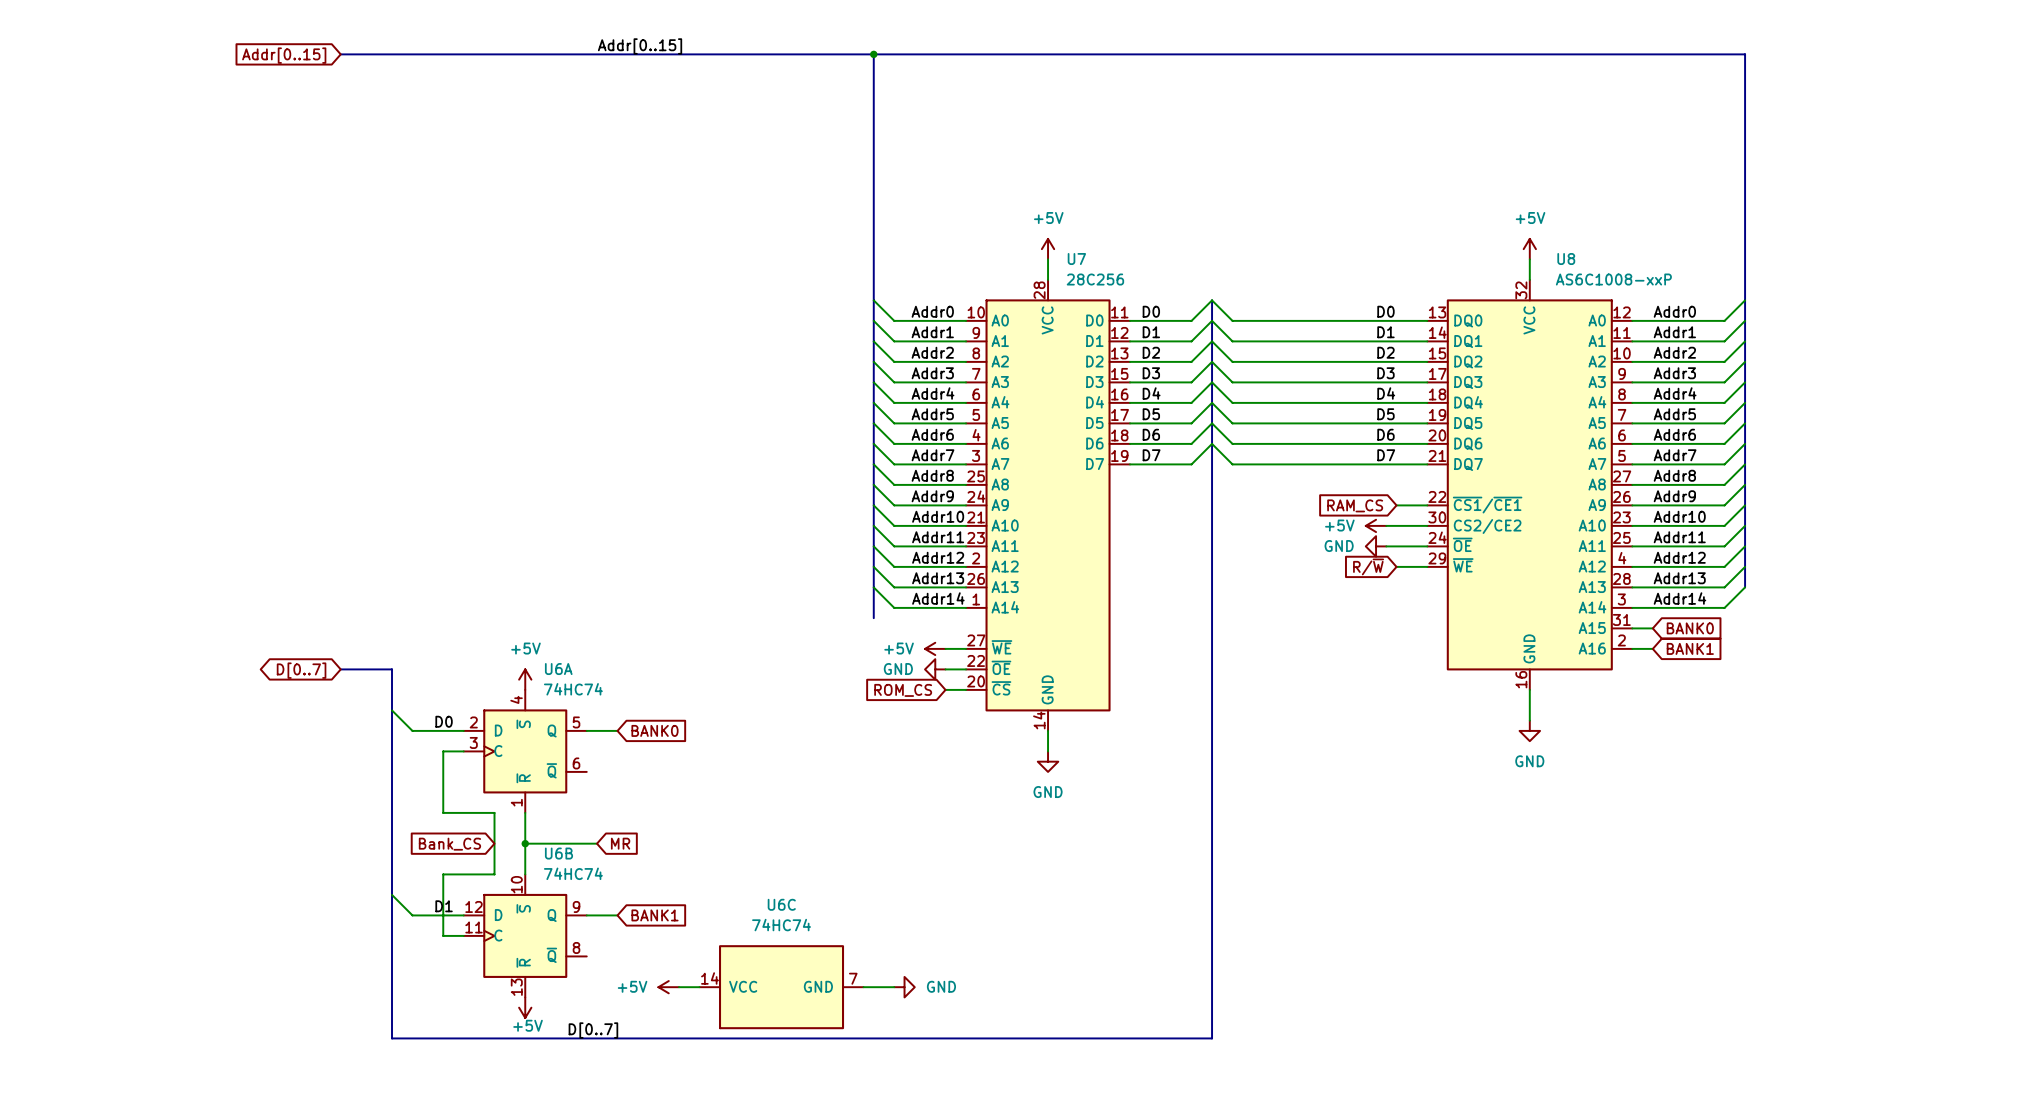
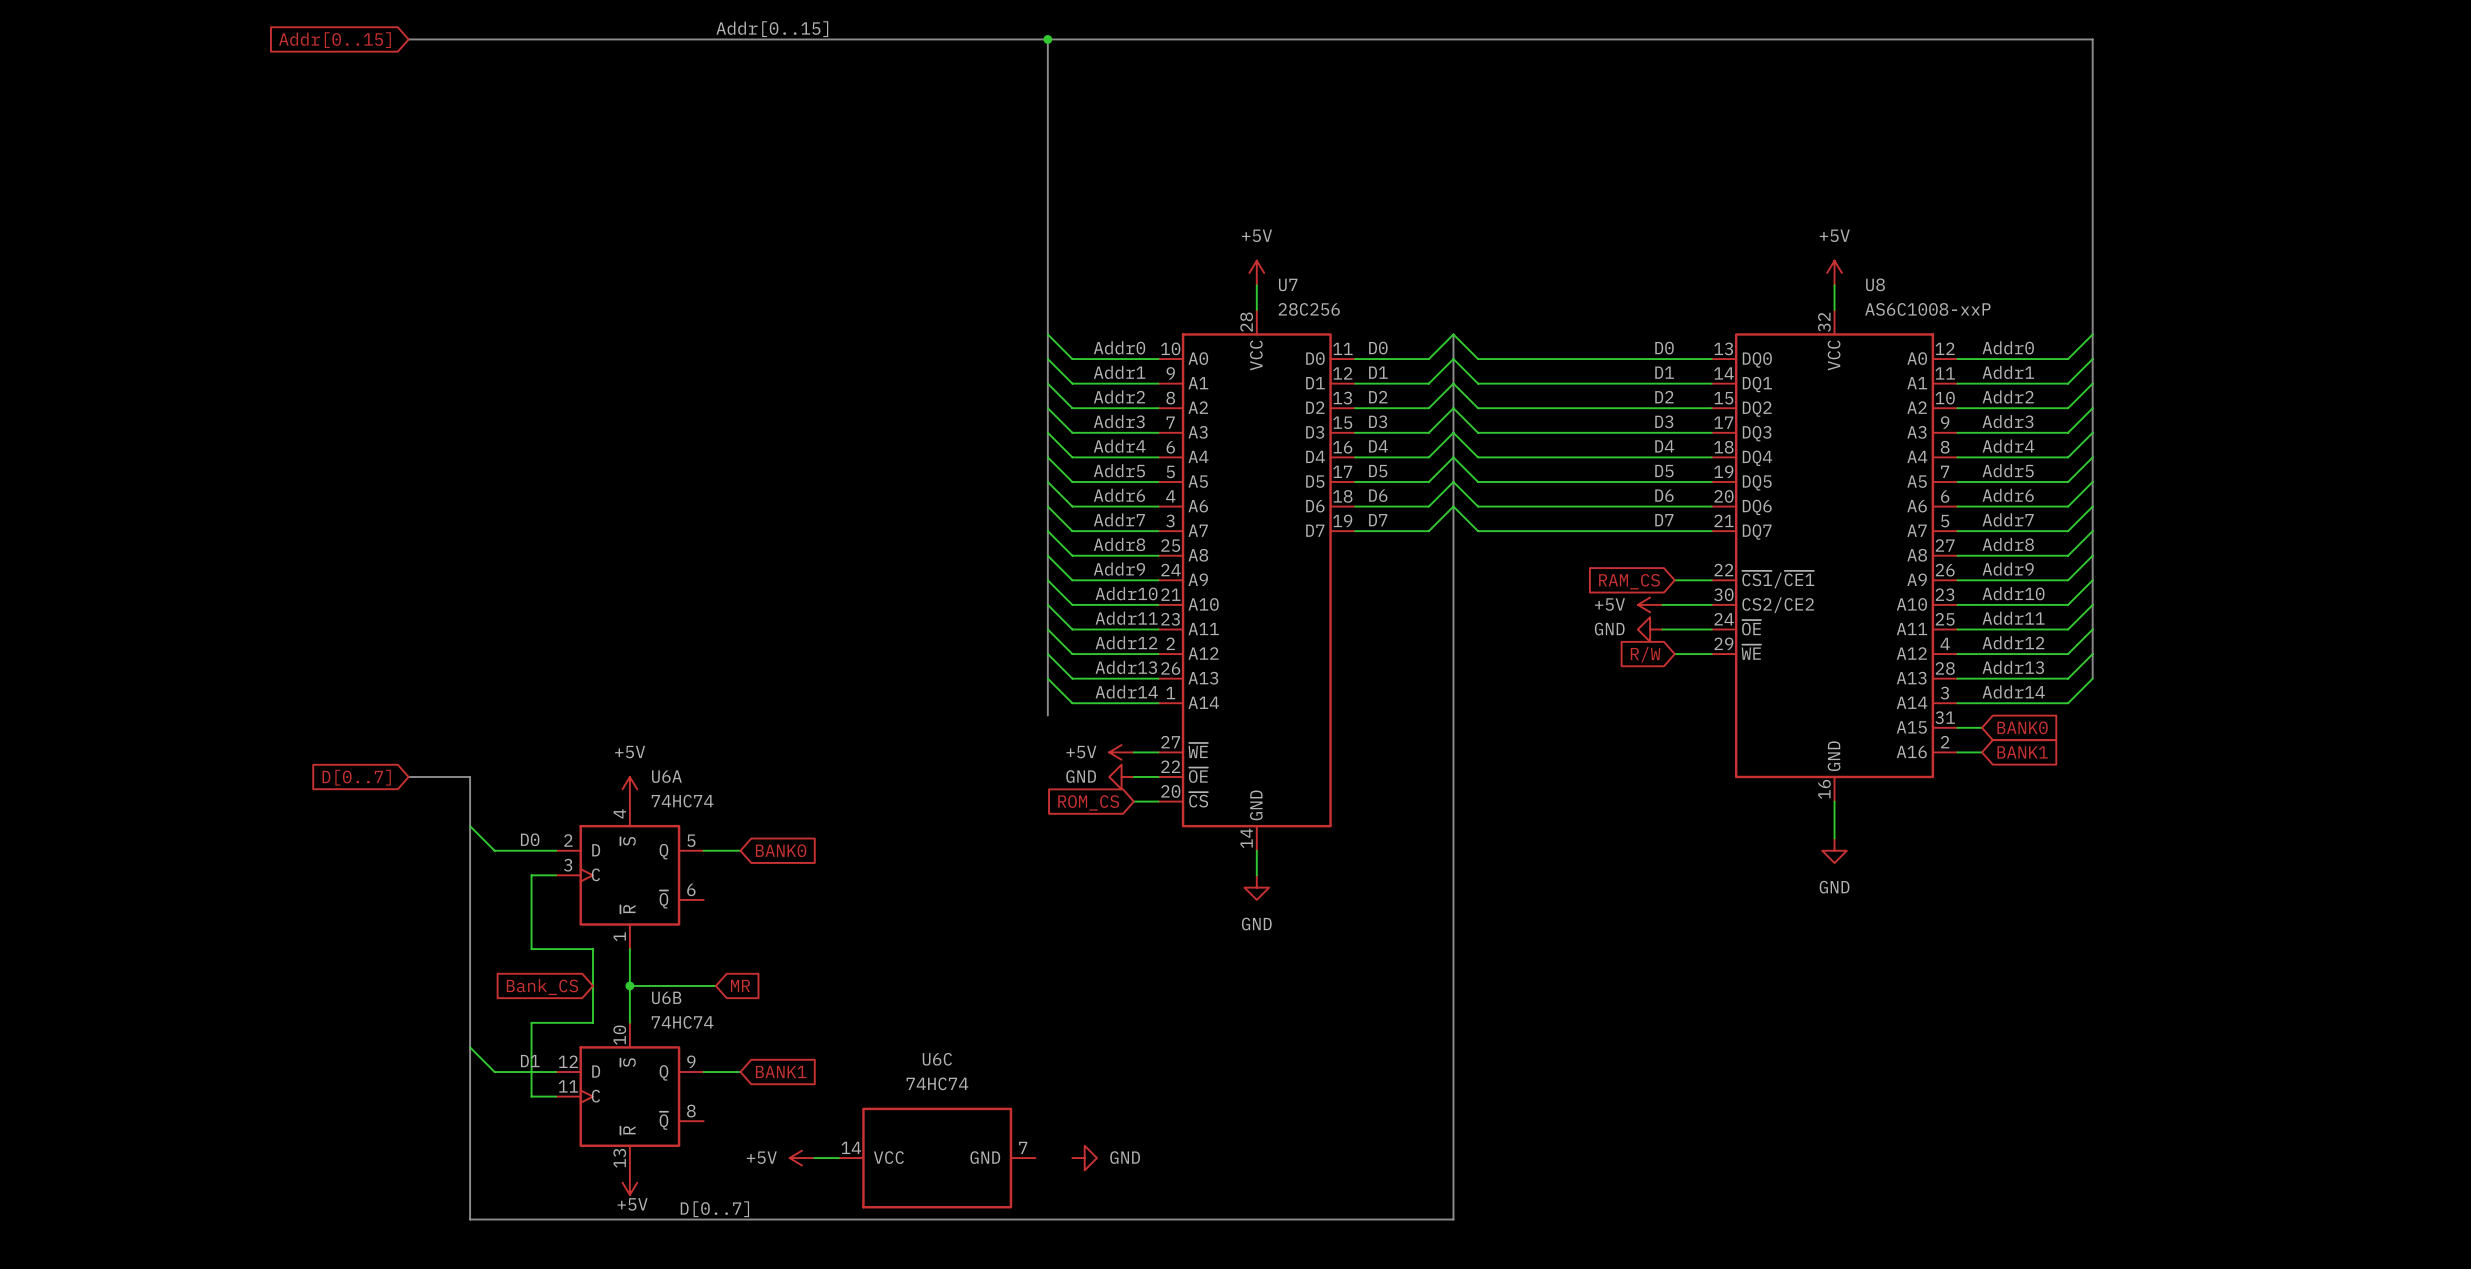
global label: R/~{W} (1368, 566) -> R/W (1645, 654)
global label shape: bidirectional (301, 670) -> input (356, 777)
wire: (863, 987) (894, 987) -> none

